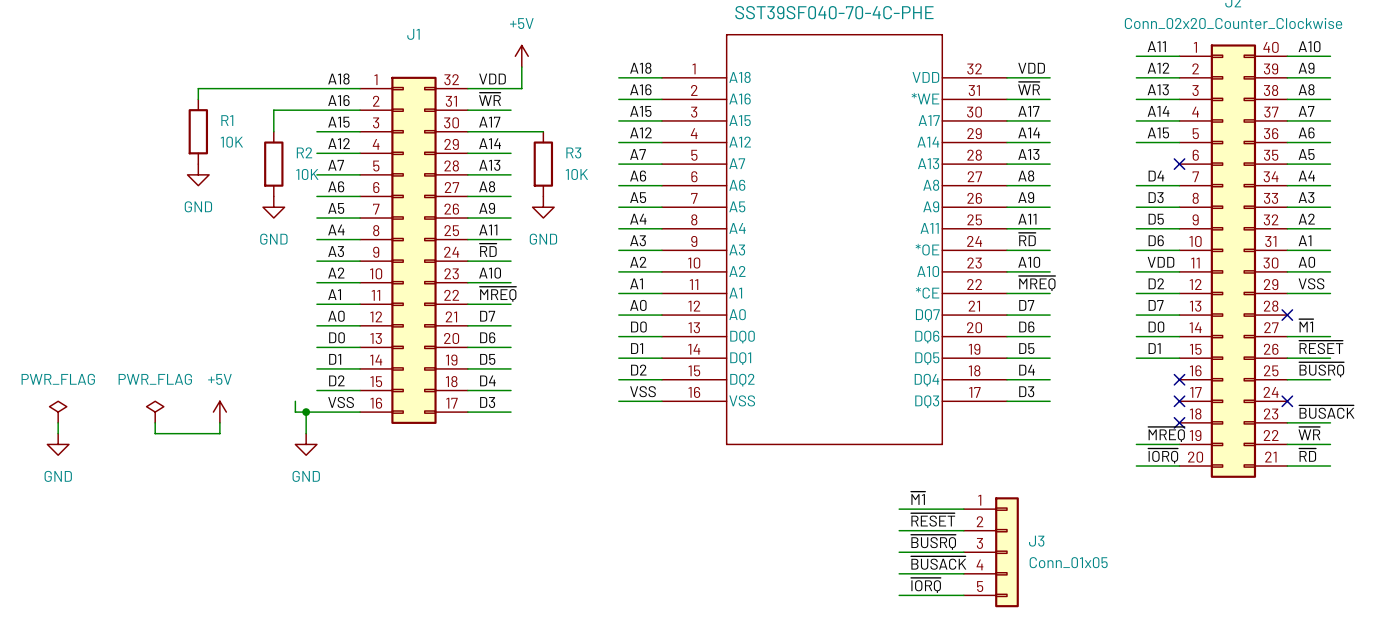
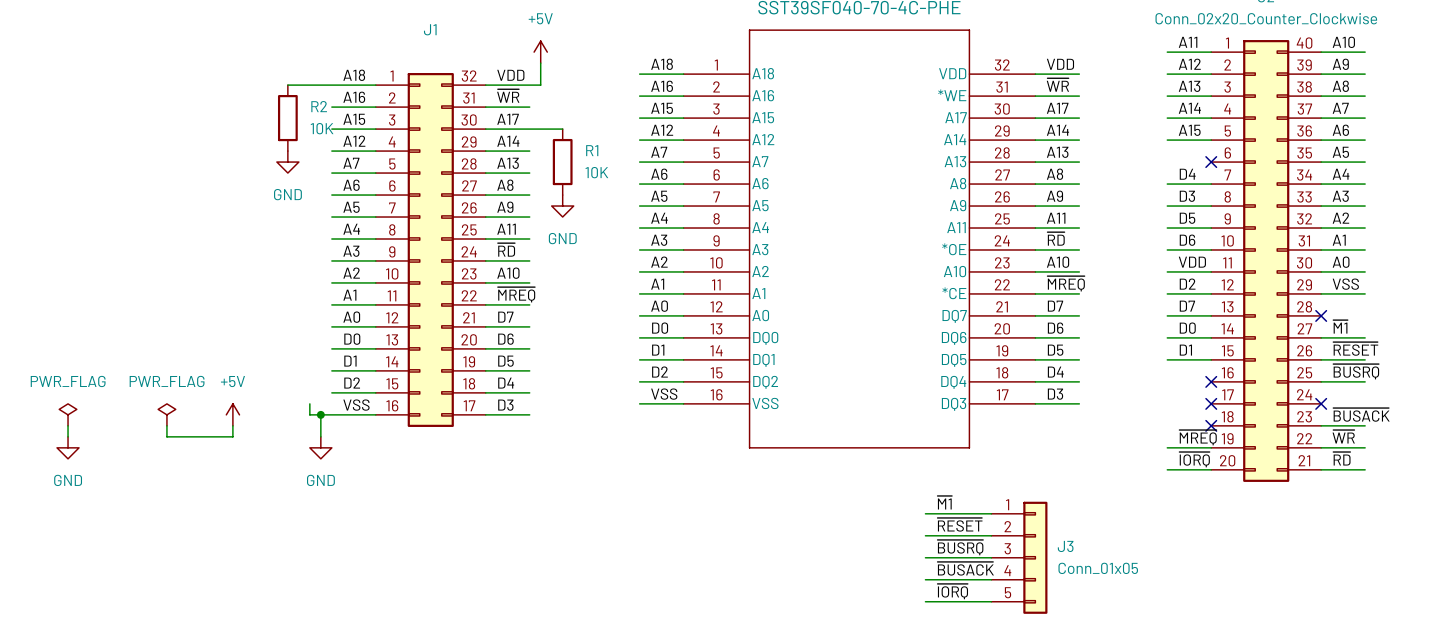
wire: (273, 88) (198, 88) (198, 99) -> none
wire: (316, 110) (273, 110) (273, 131) -> none
R1: 10K (198, 131) -> none
R3 name: R3 (573, 152) -> R1 (592, 150)
R2 position: (273, 164) -> (287, 118)
power symbol: none -> GND (287, 162)
power symbol: GND (198, 174) -> none
power symbol: GND (273, 207) -> none

